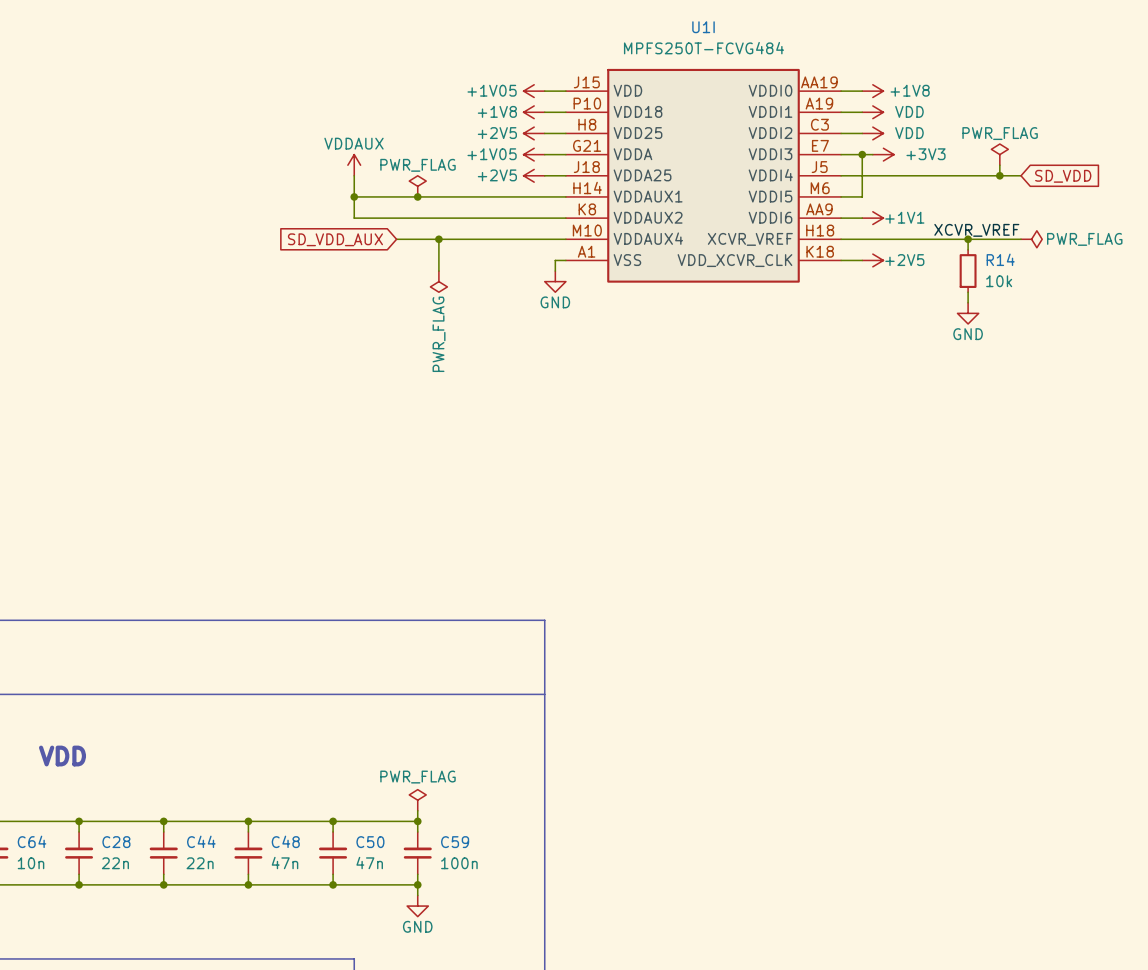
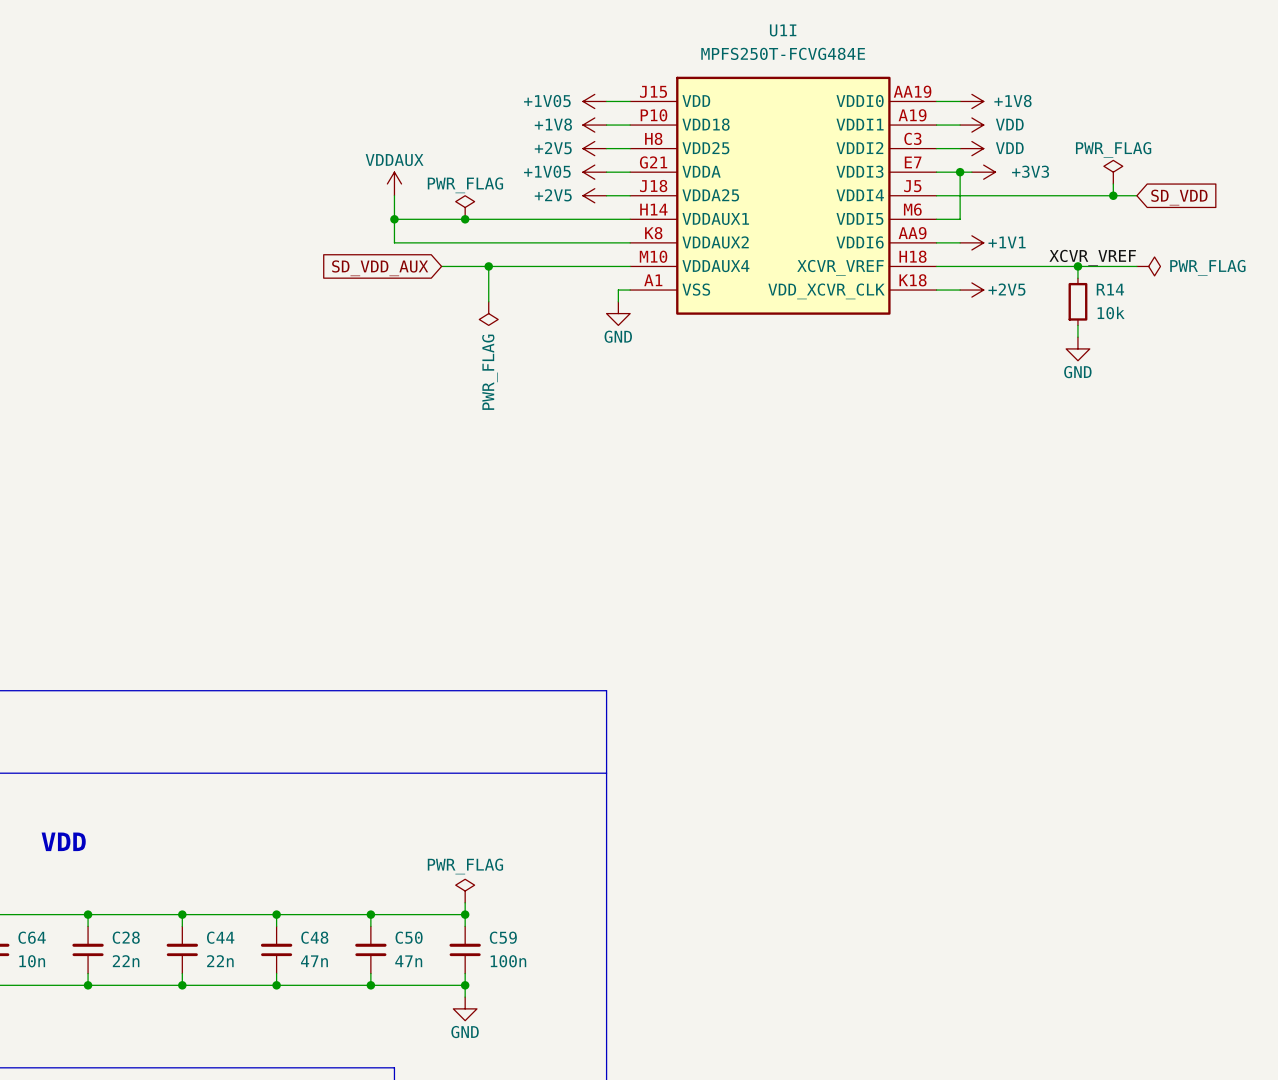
U1I text: MPFS250T-FCVG484 (704, 48) -> MPFS250T-FCVG484E (783, 53)

